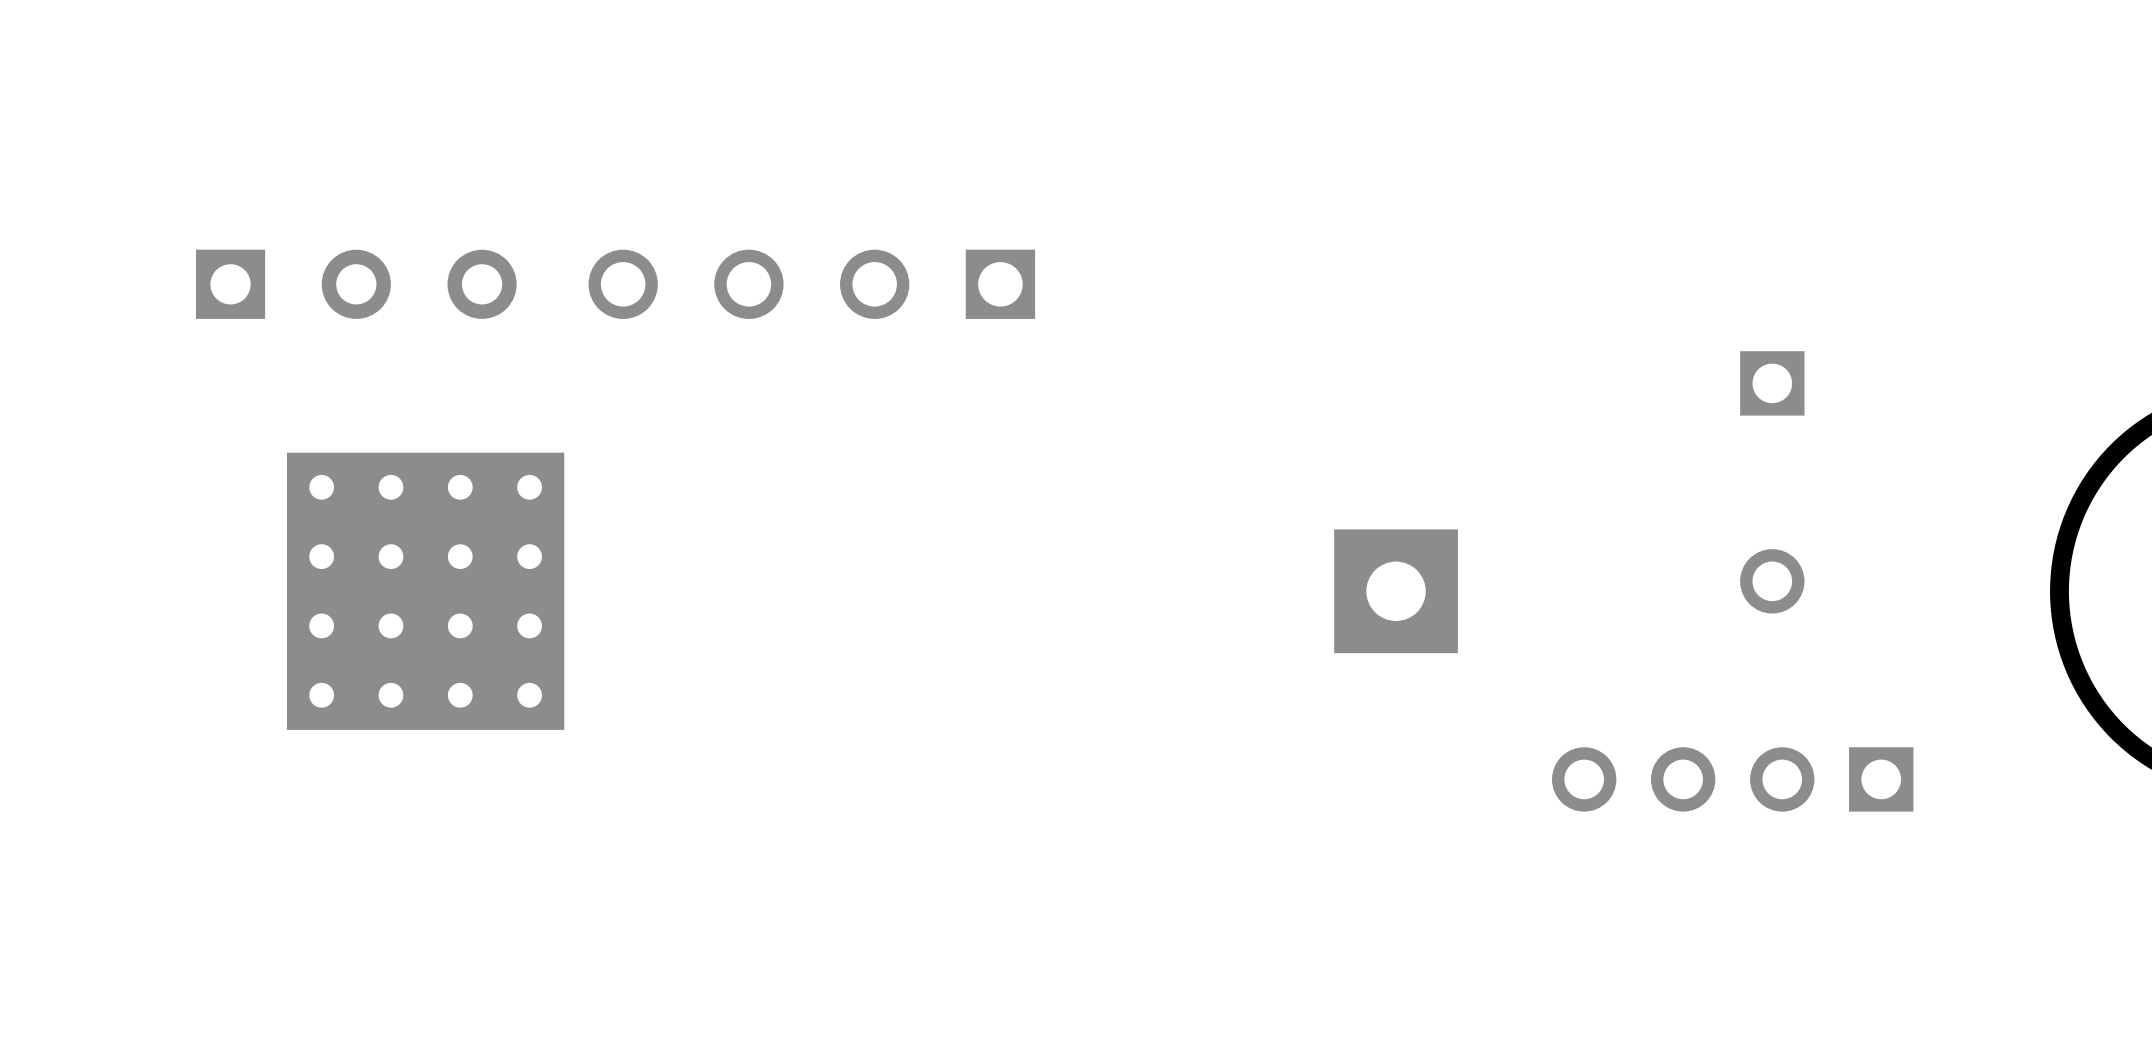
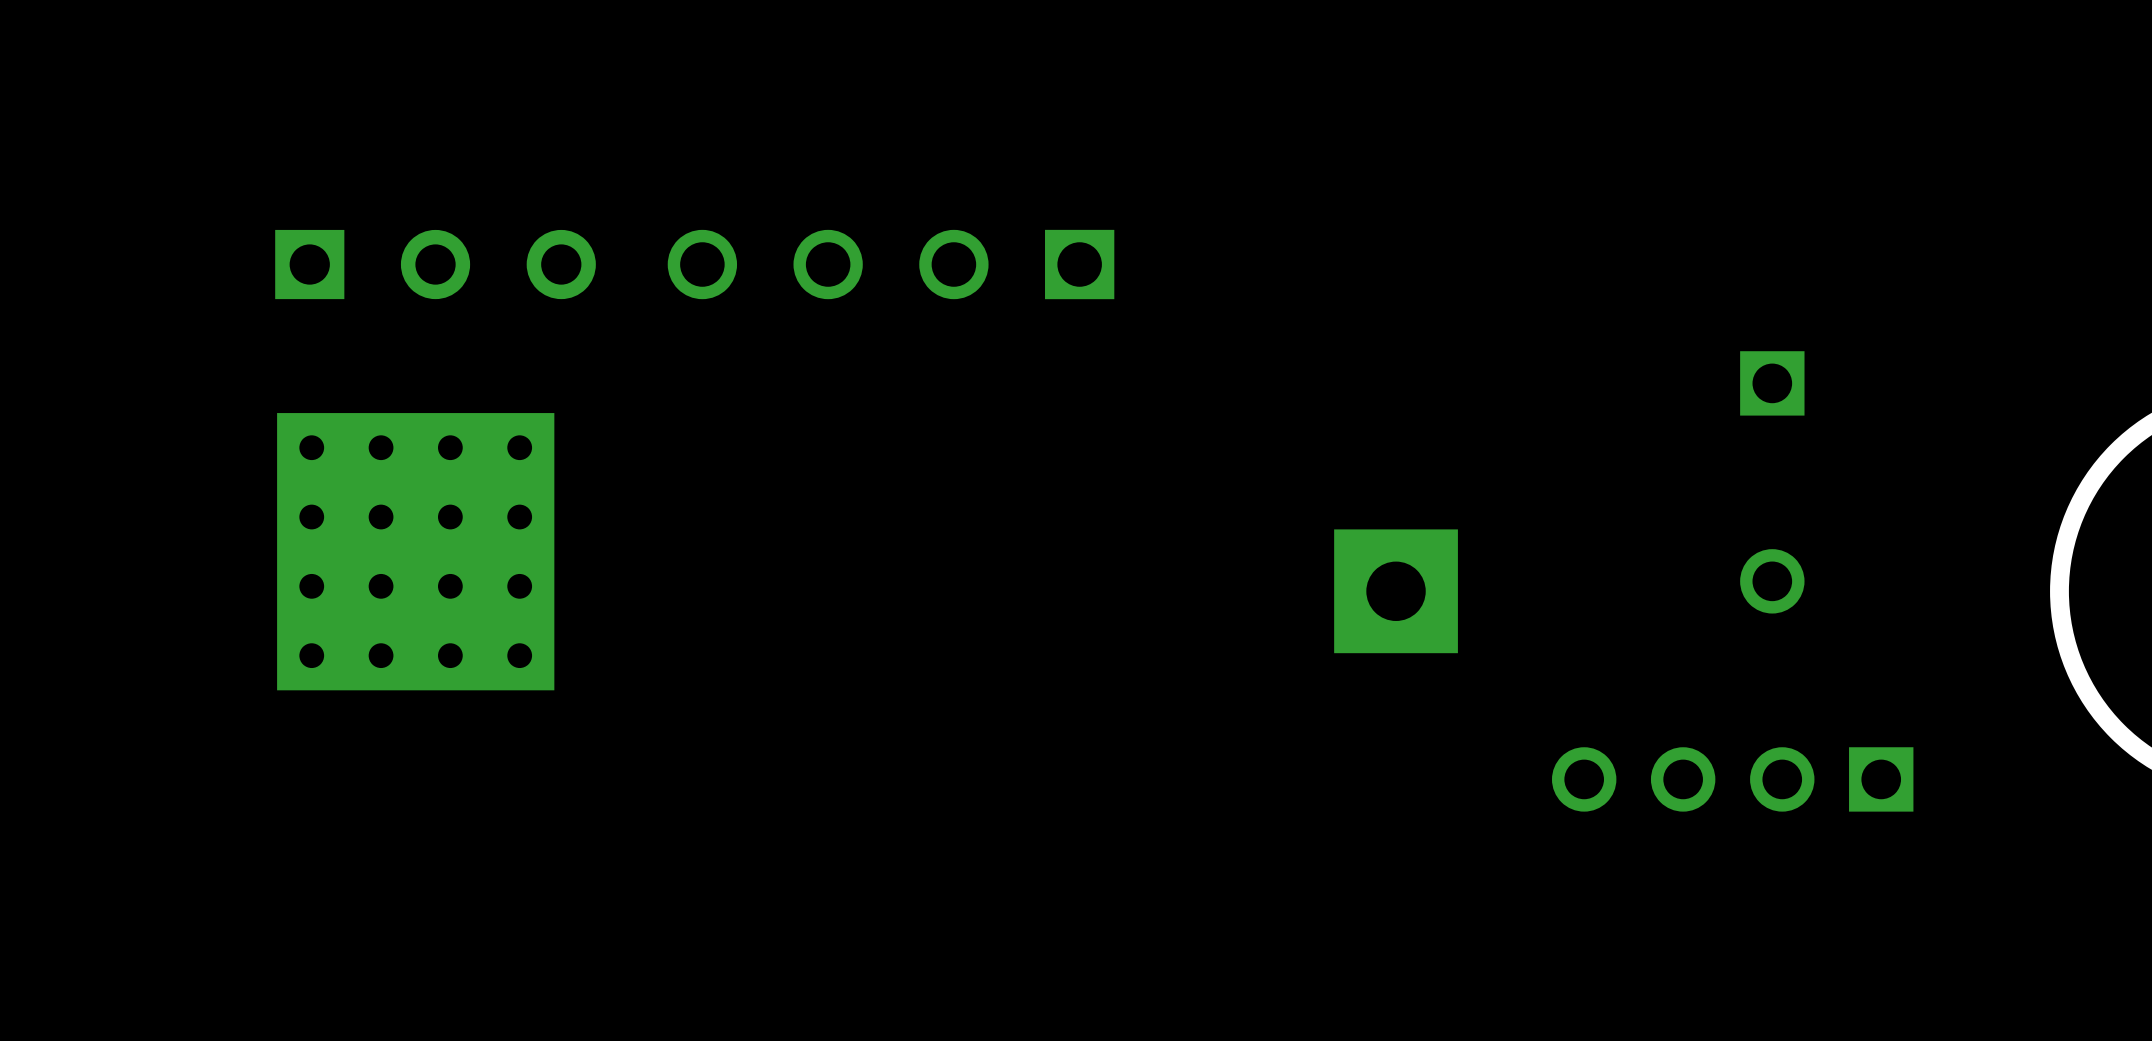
part position: (356, 284) -> (435, 264)
part position: (811, 284) -> (891, 264)
part position: (425, 591) -> (415, 551)

